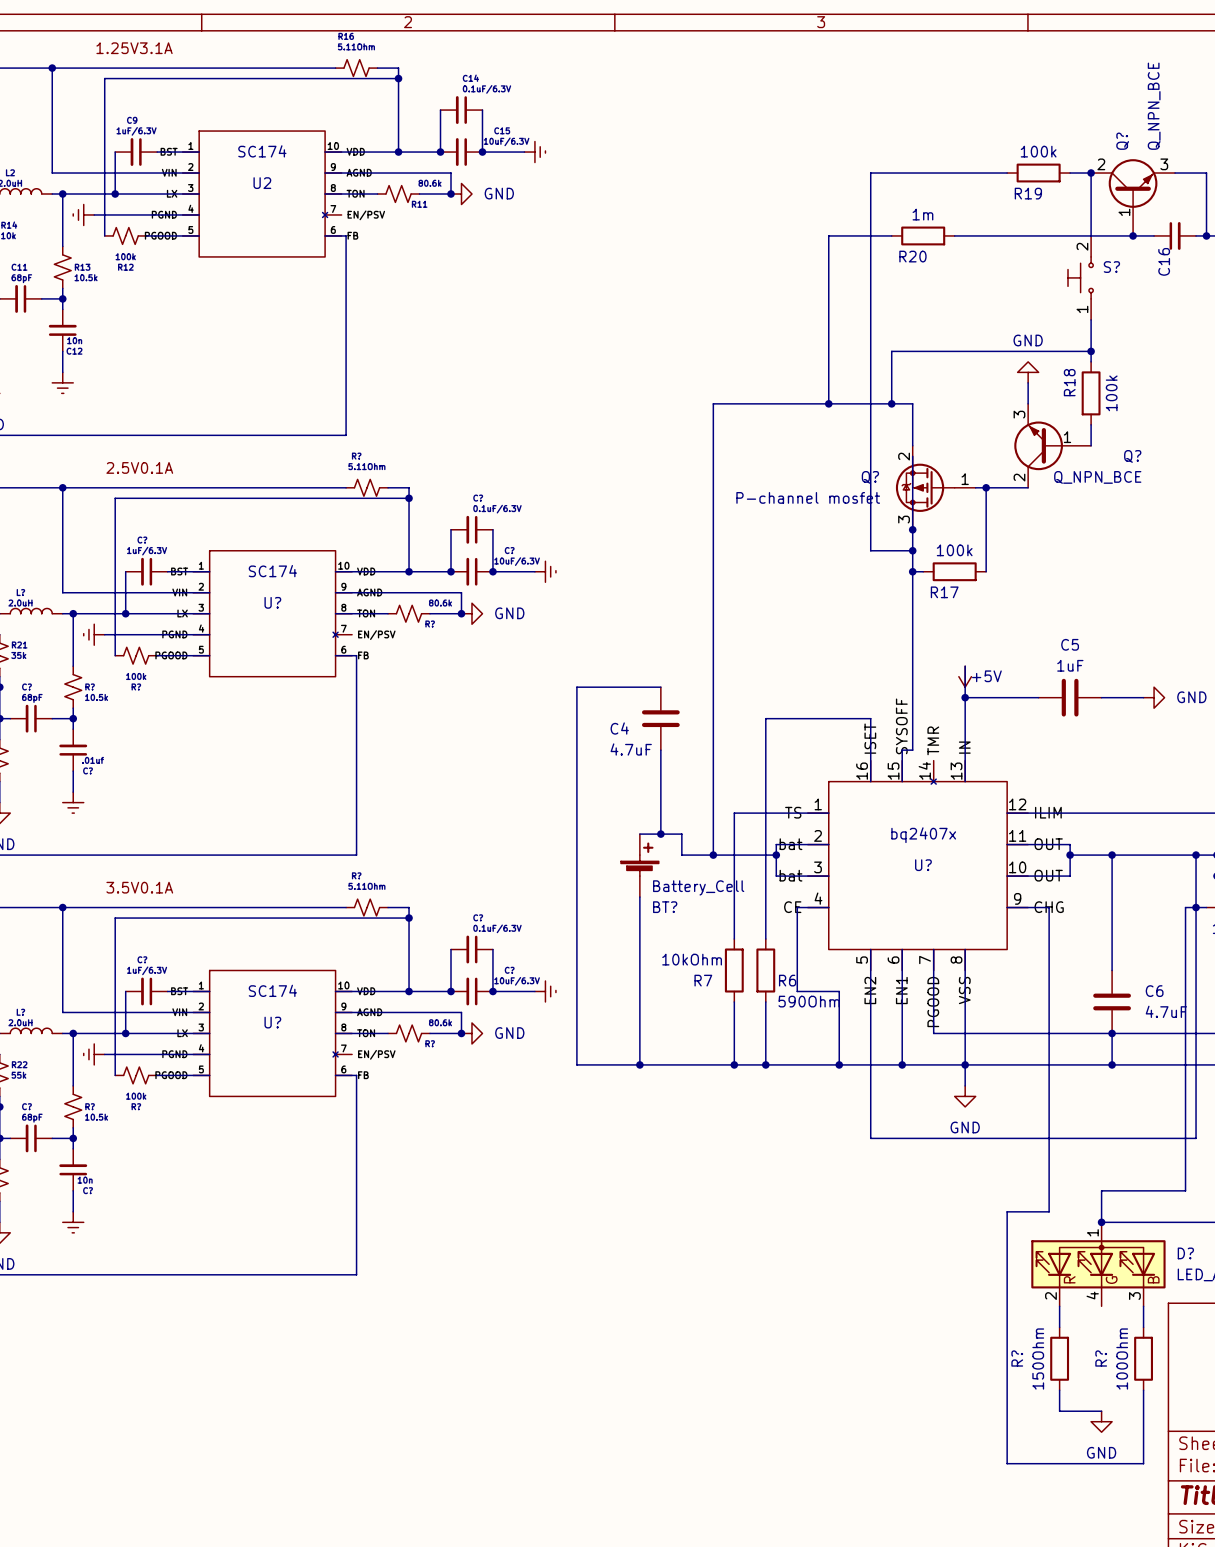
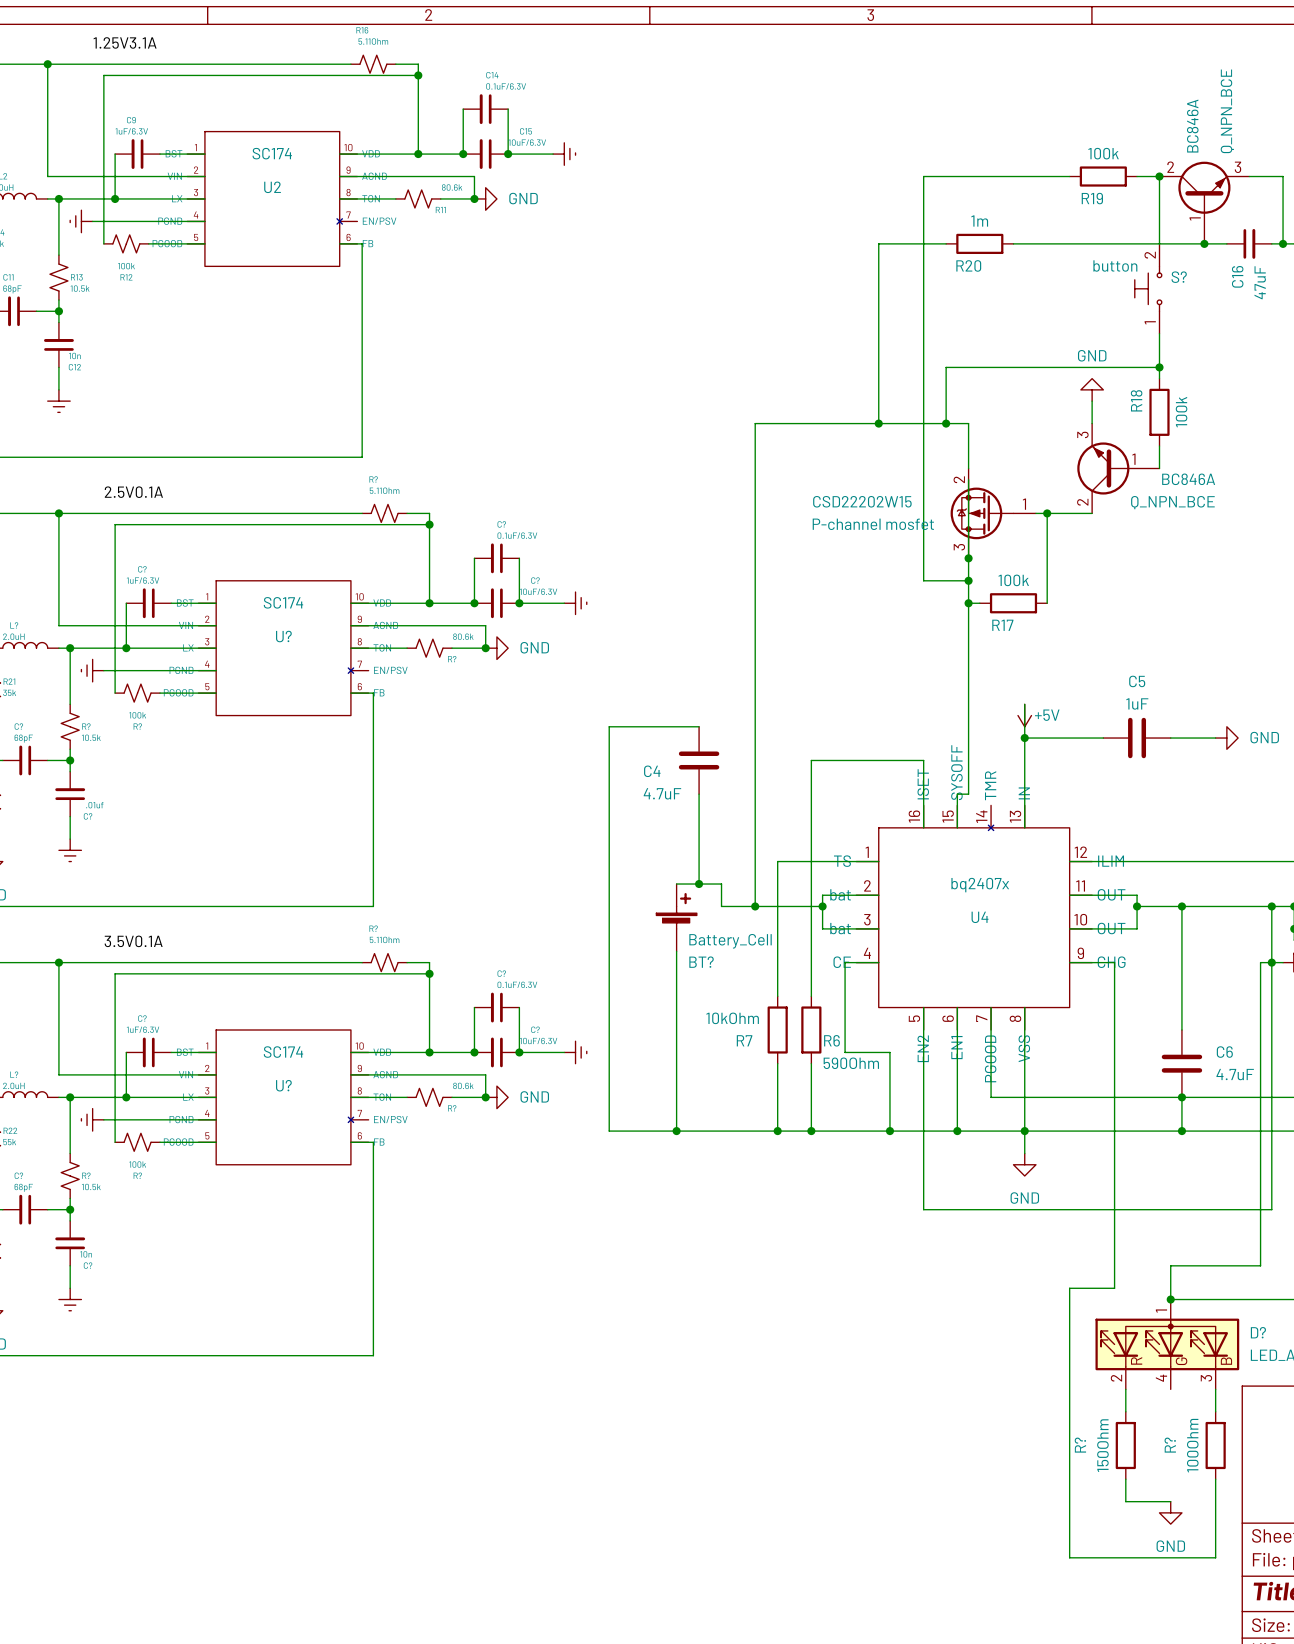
Q? name: Q? (1122, 141) -> BC846A (1192, 126)
S? value: none -> button (1115, 266)
C16 value: none -> 47uF (1260, 282)
Q? name: Q? (1132, 456) -> BC846A (1188, 479)
Q? name: Q? (870, 477) -> CSD22202W15 (862, 501)
U? name: U? (923, 865) -> U4 (980, 917)

